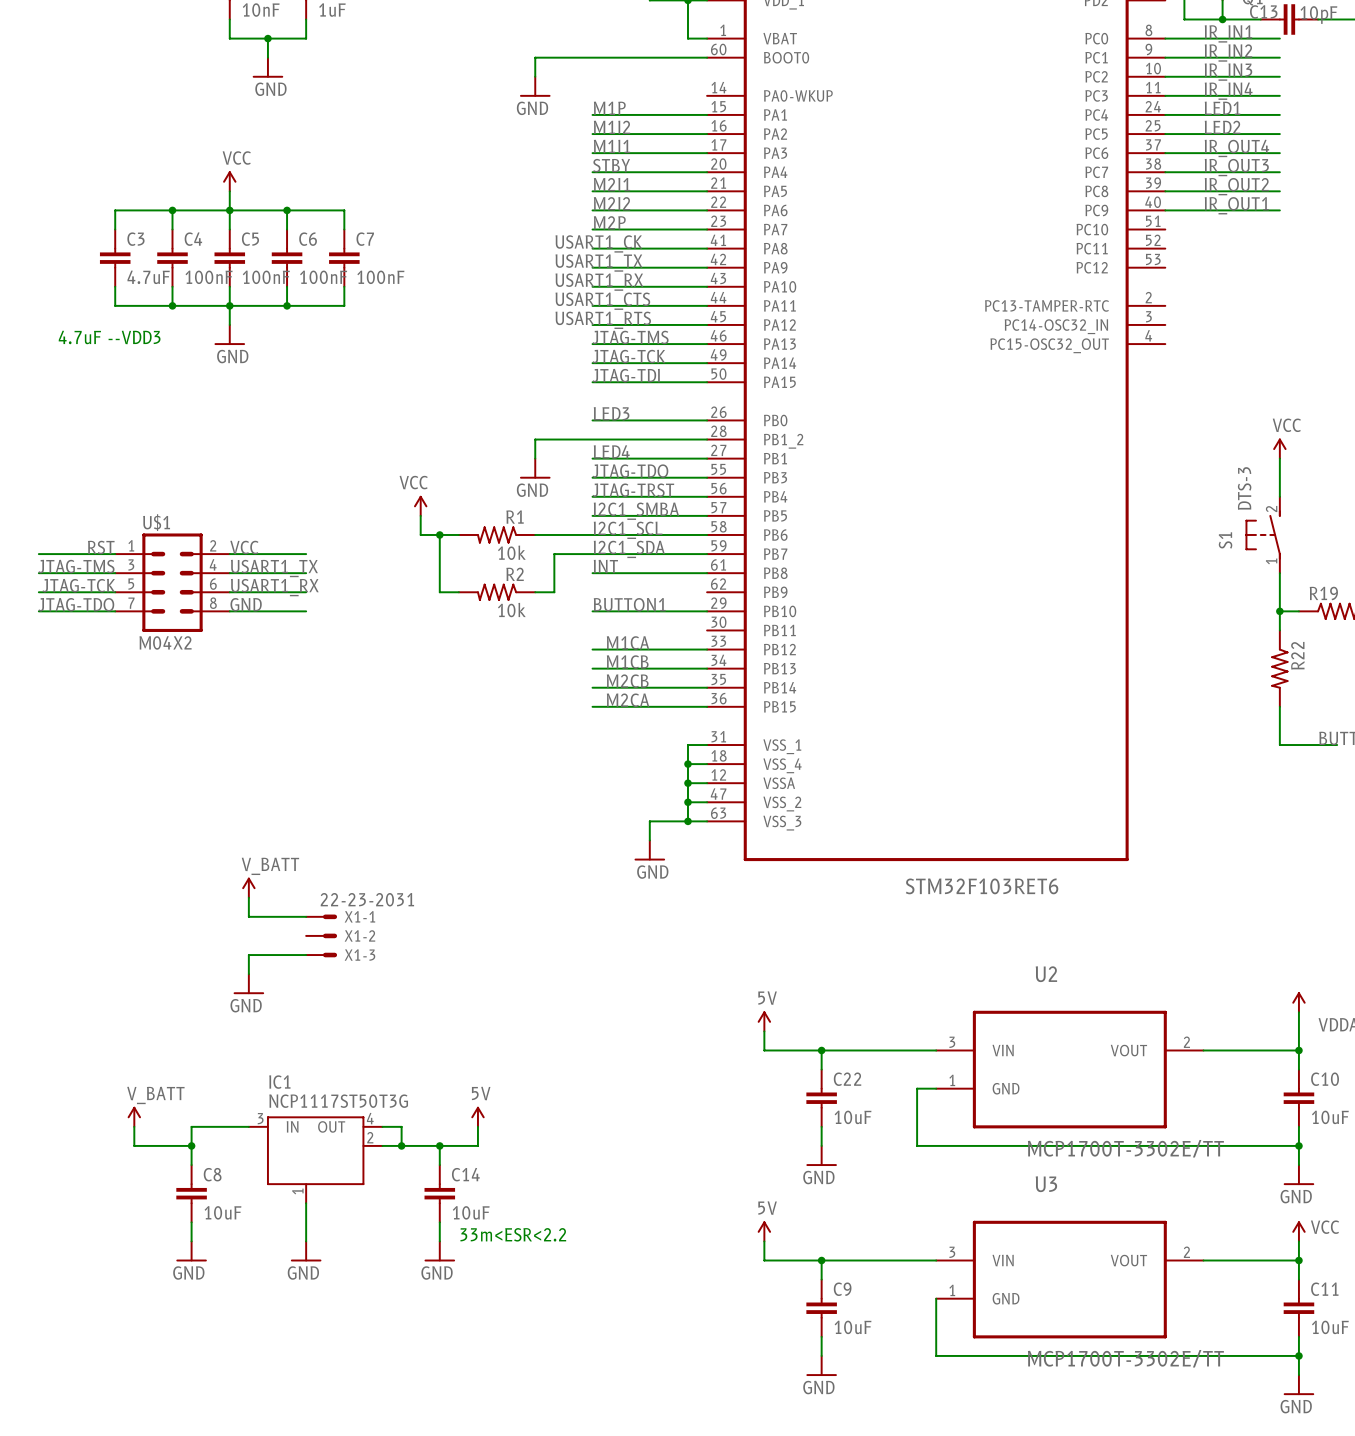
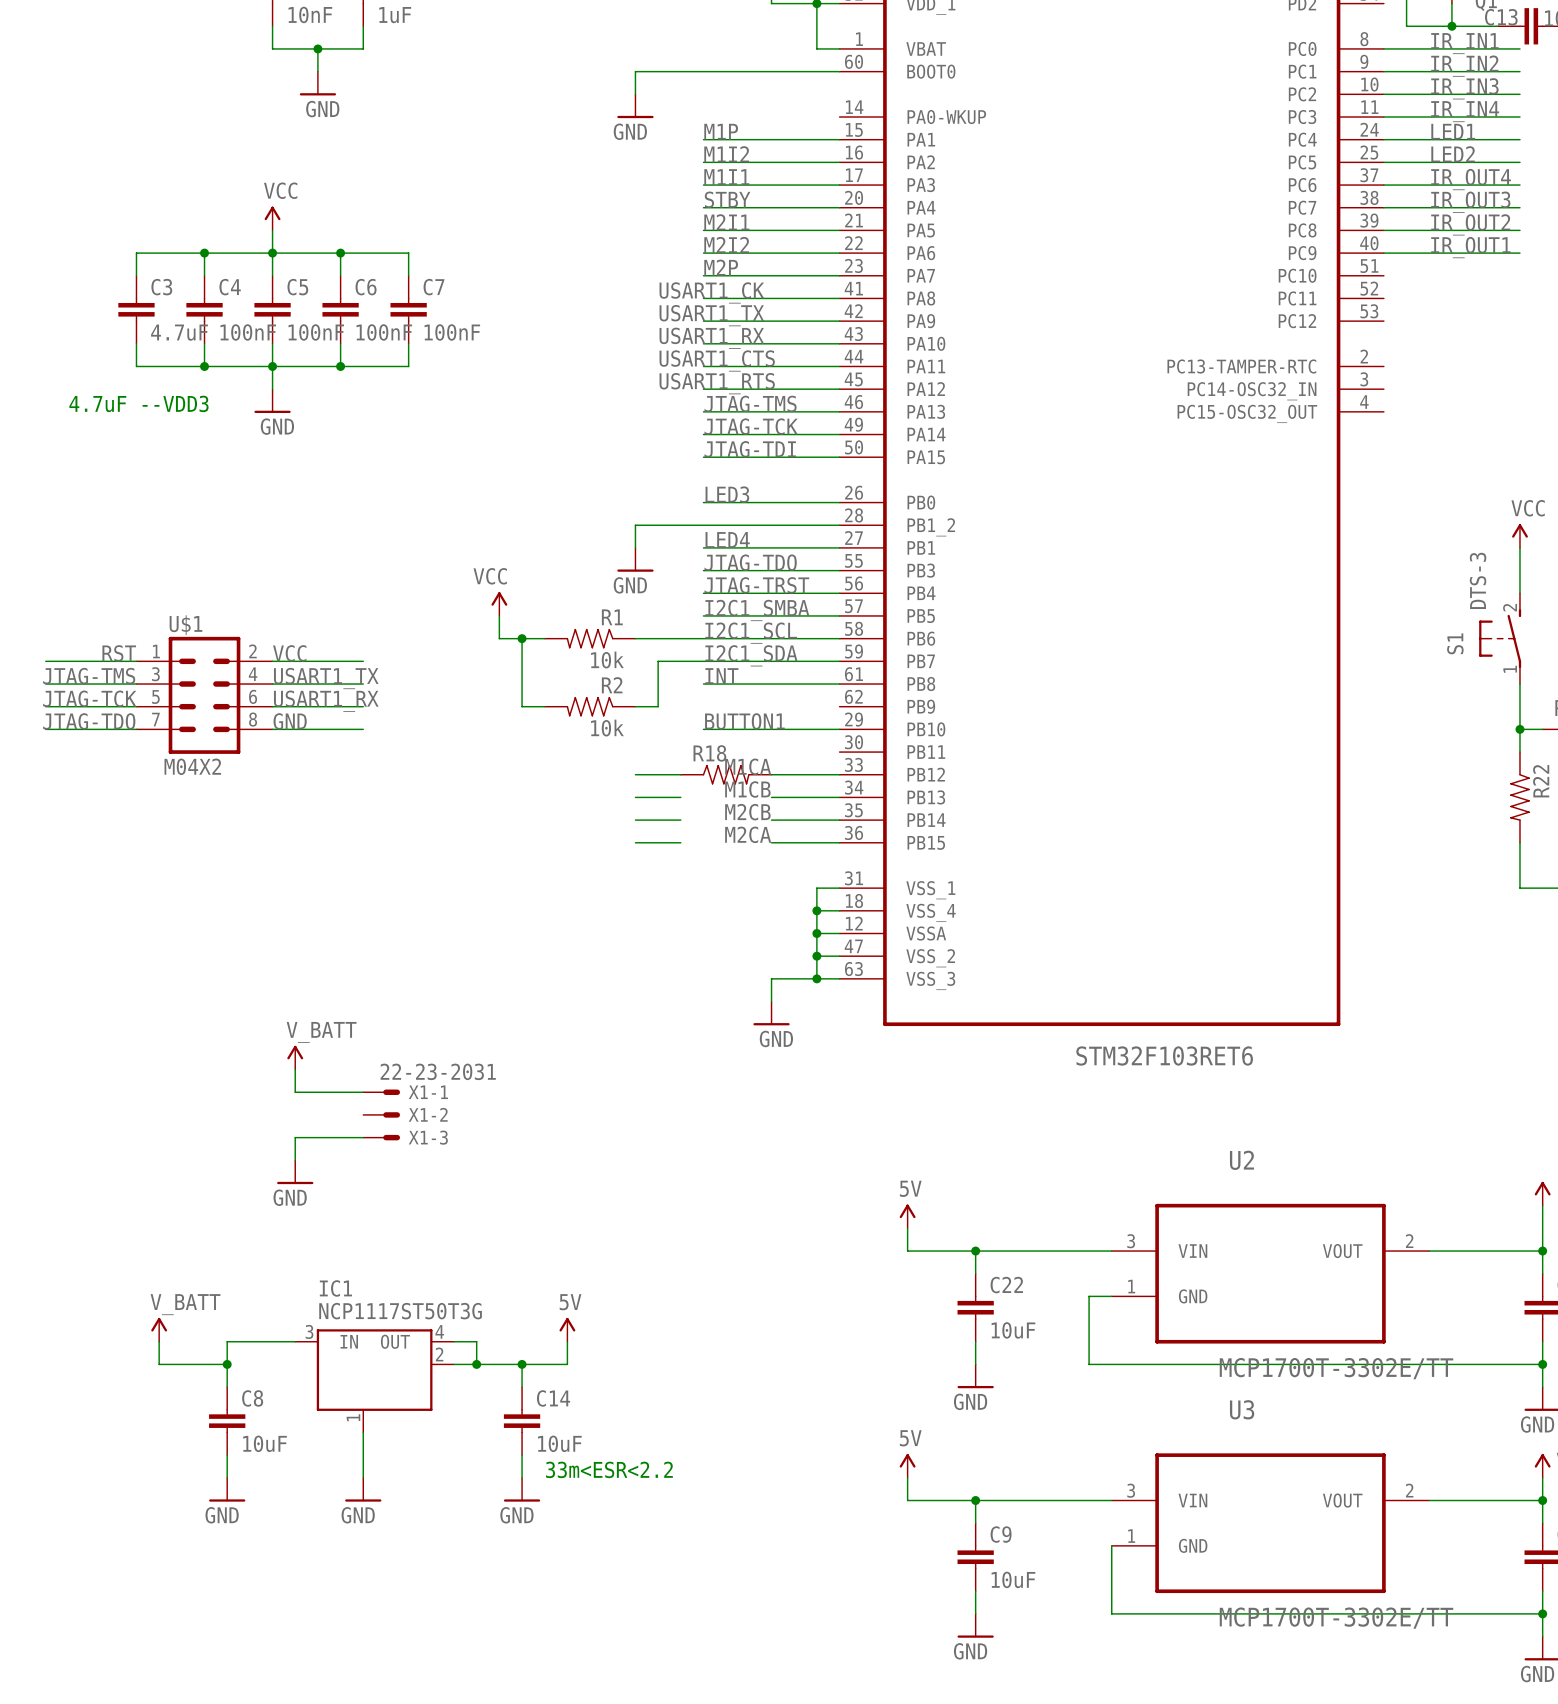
wire: none -> (635, 774) (680, 774)
R18: none -> (726, 774)
wire: none -> (635, 797) (680, 797)
wire: (592, 668) (649, 668) -> none
wire: none -> (635, 820) (680, 820)
wire: (592, 687) (649, 687) -> none
wire: none -> (635, 842) (680, 842)
wire: (592, 706) (649, 706) -> none

